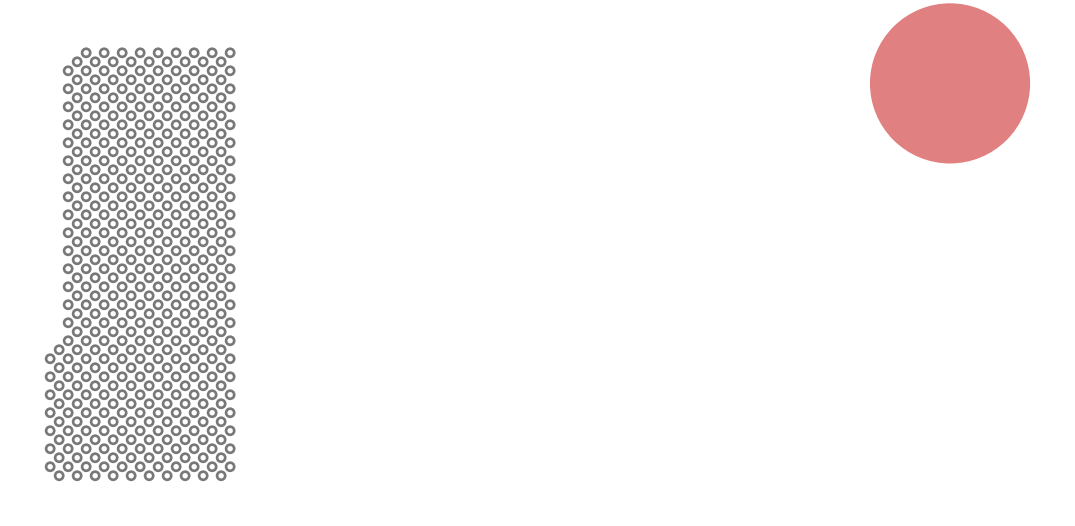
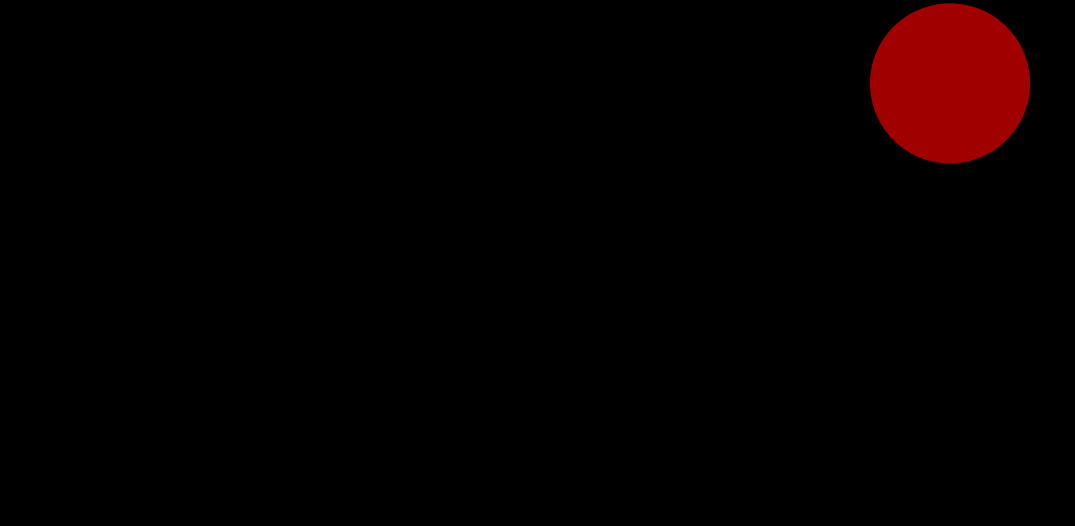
via: (86, 52) -> none
via: (104, 52) -> none
via: (122, 52) -> none
via: (140, 52) -> none
via: (158, 52) -> none
via: (176, 52) -> none
via: (194, 52) -> none
via: (212, 52) -> none
via: (230, 52) -> none
via: (77, 61) -> none
via: (95, 61) -> none
via: (113, 61) -> none
via: (131, 61) -> none
via: (149, 61) -> none
via: (167, 61) -> none
via: (185, 61) -> none
via: (203, 61) -> none
via: (221, 61) -> none
via: (68, 70) -> none
via: (86, 70) -> none
via: (104, 70) -> none
via: (122, 70) -> none
via: (140, 70) -> none
via: (158, 70) -> none
via: (176, 70) -> none
via: (194, 70) -> none
via: (212, 70) -> none
via: (230, 70) -> none
via: (77, 79) -> none
via: (95, 79) -> none
via: (113, 79) -> none
via: (131, 79) -> none
via: (149, 79) -> none
via: (167, 79) -> none
via: (185, 79) -> none
via: (203, 79) -> none
via: (221, 79) -> none
via: (68, 88) -> none
via: (86, 88) -> none
via: (104, 88) -> none
via: (122, 88) -> none
via: (140, 88) -> none
via: (158, 88) -> none
via: (176, 88) -> none
via: (194, 88) -> none
via: (212, 88) -> none
via: (230, 88) -> none
via: (77, 97) -> none
via: (95, 97) -> none
via: (113, 97) -> none
via: (131, 97) -> none
via: (149, 97) -> none
via: (167, 97) -> none
via: (185, 97) -> none
via: (203, 97) -> none
via: (221, 97) -> none
via: (68, 106) -> none
via: (86, 106) -> none
via: (104, 106) -> none
via: (122, 106) -> none
via: (140, 106) -> none
via: (158, 106) -> none
via: (176, 106) -> none
via: (194, 106) -> none
via: (212, 106) -> none
via: (230, 106) -> none
via: (77, 115) -> none
via: (95, 115) -> none
via: (113, 115) -> none
via: (131, 115) -> none
via: (149, 115) -> none
via: (167, 115) -> none
via: (185, 115) -> none
via: (203, 115) -> none
via: (221, 115) -> none
via: (68, 124) -> none
via: (86, 124) -> none
via: (104, 124) -> none
via: (122, 124) -> none
via: (140, 124) -> none
via: (158, 124) -> none
via: (176, 124) -> none
via: (194, 124) -> none
via: (212, 124) -> none
via: (230, 124) -> none
via: (77, 133) -> none
via: (95, 133) -> none
via: (113, 133) -> none
via: (131, 133) -> none
via: (149, 133) -> none
via: (167, 133) -> none
via: (185, 133) -> none
via: (203, 133) -> none
via: (221, 133) -> none
via: (68, 142) -> none
via: (86, 142) -> none
via: (104, 142) -> none
via: (122, 142) -> none
via: (140, 142) -> none
via: (158, 142) -> none
via: (176, 142) -> none
via: (194, 142) -> none
via: (212, 142) -> none
via: (230, 142) -> none
via: (77, 151) -> none
via: (95, 151) -> none
via: (113, 151) -> none
via: (131, 151) -> none
via: (149, 151) -> none
via: (167, 151) -> none
via: (185, 151) -> none
via: (203, 151) -> none
via: (221, 151) -> none
via: (68, 160) -> none
via: (86, 160) -> none
via: (104, 160) -> none
via: (122, 160) -> none
via: (140, 160) -> none
via: (158, 160) -> none
via: (176, 160) -> none
via: (194, 160) -> none
via: (212, 160) -> none
via: (230, 160) -> none
via: (77, 169) -> none
via: (95, 169) -> none
via: (113, 169) -> none
via: (131, 169) -> none
via: (149, 169) -> none
via: (167, 169) -> none
via: (185, 169) -> none
via: (203, 169) -> none
via: (221, 169) -> none
via: (68, 178) -> none
via: (86, 178) -> none
via: (104, 178) -> none
via: (122, 178) -> none
via: (140, 178) -> none
via: (158, 178) -> none
via: (176, 178) -> none
via: (194, 178) -> none
via: (212, 178) -> none
via: (230, 178) -> none
via: (77, 187) -> none
via: (95, 187) -> none
via: (113, 187) -> none
via: (131, 187) -> none
via: (149, 187) -> none
via: (167, 187) -> none
via: (185, 187) -> none
via: (203, 187) -> none
via: (221, 187) -> none
via: (68, 196) -> none
via: (86, 196) -> none
via: (104, 196) -> none
via: (122, 196) -> none
via: (140, 196) -> none
via: (158, 196) -> none
via: (176, 196) -> none
via: (194, 196) -> none
via: (212, 196) -> none
via: (230, 196) -> none
via: (77, 205) -> none
via: (95, 205) -> none
via: (113, 205) -> none
via: (131, 205) -> none
via: (149, 205) -> none
via: (167, 205) -> none
via: (185, 205) -> none
via: (203, 205) -> none
via: (221, 205) -> none
via: (68, 214) -> none
via: (86, 214) -> none
via: (104, 214) -> none
via: (122, 214) -> none
via: (140, 214) -> none
via: (158, 214) -> none
via: (176, 214) -> none
via: (194, 214) -> none
via: (212, 214) -> none
via: (230, 214) -> none
via: (77, 223) -> none
via: (95, 223) -> none
via: (113, 223) -> none
via: (131, 223) -> none
via: (149, 223) -> none
via: (167, 223) -> none
via: (185, 223) -> none
via: (203, 223) -> none
via: (221, 223) -> none
via: (68, 232) -> none
via: (86, 232) -> none
via: (104, 232) -> none
via: (122, 232) -> none
via: (140, 232) -> none
via: (158, 232) -> none
via: (176, 232) -> none
via: (194, 232) -> none
via: (212, 232) -> none
via: (230, 232) -> none
via: (77, 241) -> none
via: (95, 241) -> none
via: (113, 241) -> none
via: (131, 241) -> none
via: (149, 241) -> none
via: (167, 241) -> none
via: (185, 241) -> none
via: (203, 241) -> none
via: (221, 241) -> none
via: (68, 250) -> none
via: (86, 250) -> none
via: (104, 250) -> none
via: (122, 250) -> none
via: (140, 250) -> none
via: (158, 250) -> none
via: (176, 250) -> none
via: (194, 250) -> none
via: (212, 250) -> none
via: (230, 250) -> none
via: (77, 259) -> none
via: (95, 259) -> none
via: (113, 259) -> none
via: (131, 259) -> none
via: (149, 259) -> none
via: (167, 259) -> none
via: (185, 259) -> none
via: (203, 259) -> none
via: (221, 259) -> none
via: (68, 268) -> none
via: (86, 268) -> none
via: (104, 268) -> none
via: (122, 268) -> none
via: (140, 268) -> none
via: (158, 268) -> none
via: (176, 268) -> none
via: (194, 268) -> none
via: (212, 268) -> none
via: (230, 268) -> none
via: (77, 277) -> none
via: (95, 277) -> none
via: (113, 277) -> none
via: (131, 277) -> none
via: (149, 277) -> none
via: (167, 277) -> none
via: (185, 277) -> none
via: (203, 277) -> none
via: (221, 277) -> none
via: (68, 286) -> none
via: (86, 286) -> none
via: (104, 286) -> none
via: (122, 286) -> none
via: (140, 286) -> none
via: (158, 286) -> none
via: (176, 286) -> none
via: (194, 286) -> none
via: (212, 286) -> none
via: (230, 286) -> none
via: (77, 295) -> none
via: (95, 295) -> none
via: (113, 295) -> none
via: (131, 295) -> none
via: (149, 295) -> none
via: (167, 295) -> none
via: (185, 295) -> none
via: (203, 295) -> none
via: (221, 295) -> none
via: (68, 304) -> none
via: (86, 304) -> none
via: (104, 304) -> none
via: (122, 304) -> none
via: (140, 304) -> none
via: (158, 304) -> none
via: (176, 304) -> none
via: (194, 304) -> none
via: (212, 304) -> none
via: (230, 304) -> none
via: (77, 313) -> none
via: (95, 313) -> none
via: (113, 313) -> none
via: (131, 313) -> none
via: (149, 313) -> none
via: (167, 313) -> none
via: (185, 313) -> none
via: (203, 313) -> none
via: (221, 313) -> none
via: (68, 322) -> none
via: (86, 322) -> none
via: (104, 322) -> none
via: (122, 322) -> none
via: (140, 322) -> none
via: (158, 322) -> none
via: (176, 322) -> none
via: (194, 322) -> none
via: (212, 322) -> none
via: (230, 322) -> none
via: (77, 331) -> none
via: (95, 331) -> none
via: (113, 331) -> none
via: (131, 331) -> none
via: (149, 331) -> none
via: (167, 331) -> none
via: (185, 331) -> none
via: (203, 331) -> none
via: (221, 331) -> none
via: (68, 340) -> none
via: (86, 340) -> none
via: (104, 340) -> none
via: (122, 340) -> none
via: (140, 340) -> none
via: (158, 340) -> none
via: (176, 340) -> none
via: (194, 340) -> none
via: (212, 340) -> none
via: (230, 340) -> none
via: (59, 349) -> none
via: (77, 349) -> none
via: (95, 349) -> none
via: (113, 349) -> none
via: (131, 349) -> none
via: (149, 349) -> none
via: (167, 349) -> none
via: (185, 349) -> none
via: (203, 349) -> none
via: (221, 349) -> none
via: (50, 358) -> none
via: (68, 358) -> none
via: (86, 358) -> none
via: (104, 358) -> none
via: (122, 358) -> none
via: (140, 358) -> none
via: (158, 358) -> none
via: (176, 358) -> none
via: (194, 358) -> none
via: (212, 358) -> none
via: (230, 358) -> none
via: (59, 367) -> none
via: (77, 367) -> none
via: (95, 367) -> none
via: (113, 367) -> none
via: (131, 367) -> none
via: (149, 367) -> none
via: (167, 367) -> none
via: (185, 367) -> none
via: (203, 367) -> none
via: (221, 367) -> none
via: (50, 376) -> none
via: (68, 376) -> none
via: (86, 376) -> none
via: (104, 376) -> none
via: (122, 376) -> none
via: (140, 376) -> none
via: (158, 376) -> none
via: (176, 376) -> none
via: (194, 376) -> none
via: (212, 376) -> none
via: (230, 376) -> none
via: (59, 385) -> none
via: (77, 385) -> none
via: (95, 385) -> none
via: (113, 385) -> none
via: (131, 385) -> none
via: (149, 385) -> none
via: (167, 385) -> none
via: (185, 385) -> none
via: (203, 385) -> none
via: (221, 385) -> none
via: (50, 394) -> none
via: (68, 394) -> none
via: (86, 394) -> none
via: (104, 394) -> none
via: (122, 394) -> none
via: (140, 394) -> none
via: (158, 394) -> none
via: (176, 394) -> none
via: (194, 394) -> none
via: (212, 394) -> none
via: (230, 394) -> none
via: (59, 403) -> none
via: (77, 403) -> none
via: (95, 403) -> none
via: (113, 403) -> none
via: (131, 403) -> none
via: (149, 403) -> none
via: (167, 403) -> none
via: (185, 403) -> none
via: (203, 403) -> none
via: (221, 403) -> none
via: (50, 412) -> none
via: (68, 412) -> none
via: (86, 412) -> none
via: (104, 412) -> none
via: (122, 412) -> none
via: (140, 412) -> none
via: (158, 412) -> none
via: (176, 412) -> none
via: (194, 412) -> none
via: (212, 412) -> none
via: (230, 412) -> none
via: (59, 421) -> none
via: (77, 421) -> none
via: (95, 421) -> none
via: (113, 421) -> none
via: (131, 421) -> none
via: (149, 421) -> none
via: (167, 421) -> none
via: (185, 421) -> none
via: (203, 421) -> none
via: (221, 421) -> none
via: (50, 430) -> none
via: (68, 430) -> none
via: (86, 430) -> none
via: (104, 430) -> none
via: (122, 430) -> none
via: (140, 430) -> none
via: (158, 430) -> none
via: (176, 430) -> none
via: (194, 430) -> none
via: (212, 430) -> none
via: (230, 430) -> none
via: (59, 439) -> none
via: (77, 439) -> none
via: (95, 439) -> none
via: (113, 439) -> none
via: (131, 439) -> none
via: (149, 439) -> none
via: (167, 439) -> none
via: (185, 439) -> none
via: (203, 439) -> none
via: (221, 439) -> none
via: (50, 448) -> none
via: (68, 448) -> none
via: (86, 448) -> none
via: (104, 448) -> none
via: (122, 448) -> none
via: (140, 448) -> none
via: (158, 448) -> none
via: (176, 448) -> none
via: (194, 448) -> none
via: (212, 448) -> none
via: (230, 448) -> none
via: (59, 457) -> none
via: (77, 457) -> none
via: (95, 457) -> none
via: (113, 457) -> none
via: (131, 457) -> none
via: (149, 457) -> none
via: (167, 457) -> none
via: (185, 457) -> none
via: (203, 457) -> none
via: (221, 457) -> none
via: (50, 466) -> none
via: (68, 466) -> none
via: (86, 466) -> none
via: (104, 466) -> none
via: (122, 466) -> none
via: (140, 466) -> none
via: (158, 466) -> none
via: (176, 466) -> none
via: (194, 466) -> none
via: (212, 466) -> none
via: (230, 466) -> none
via: (59, 475) -> none
via: (77, 475) -> none
via: (95, 475) -> none
via: (113, 475) -> none
via: (131, 475) -> none
via: (149, 475) -> none
via: (167, 475) -> none
via: (185, 475) -> none
via: (203, 475) -> none
via: (221, 475) -> none

